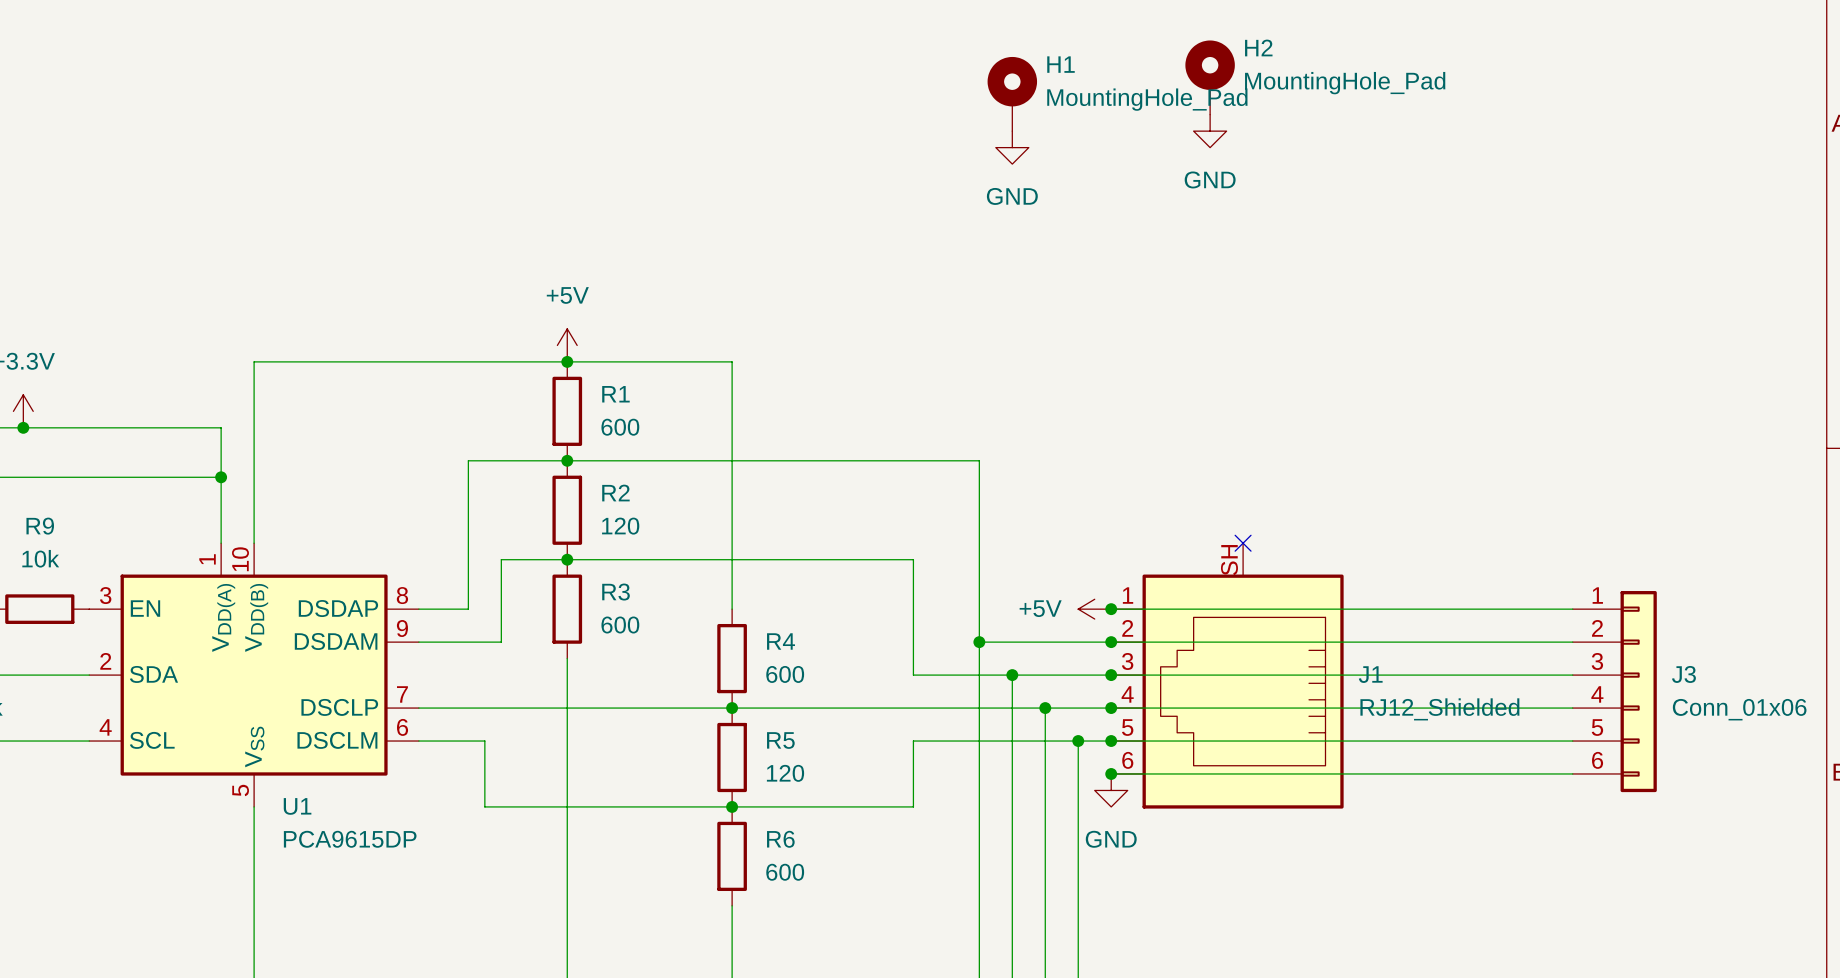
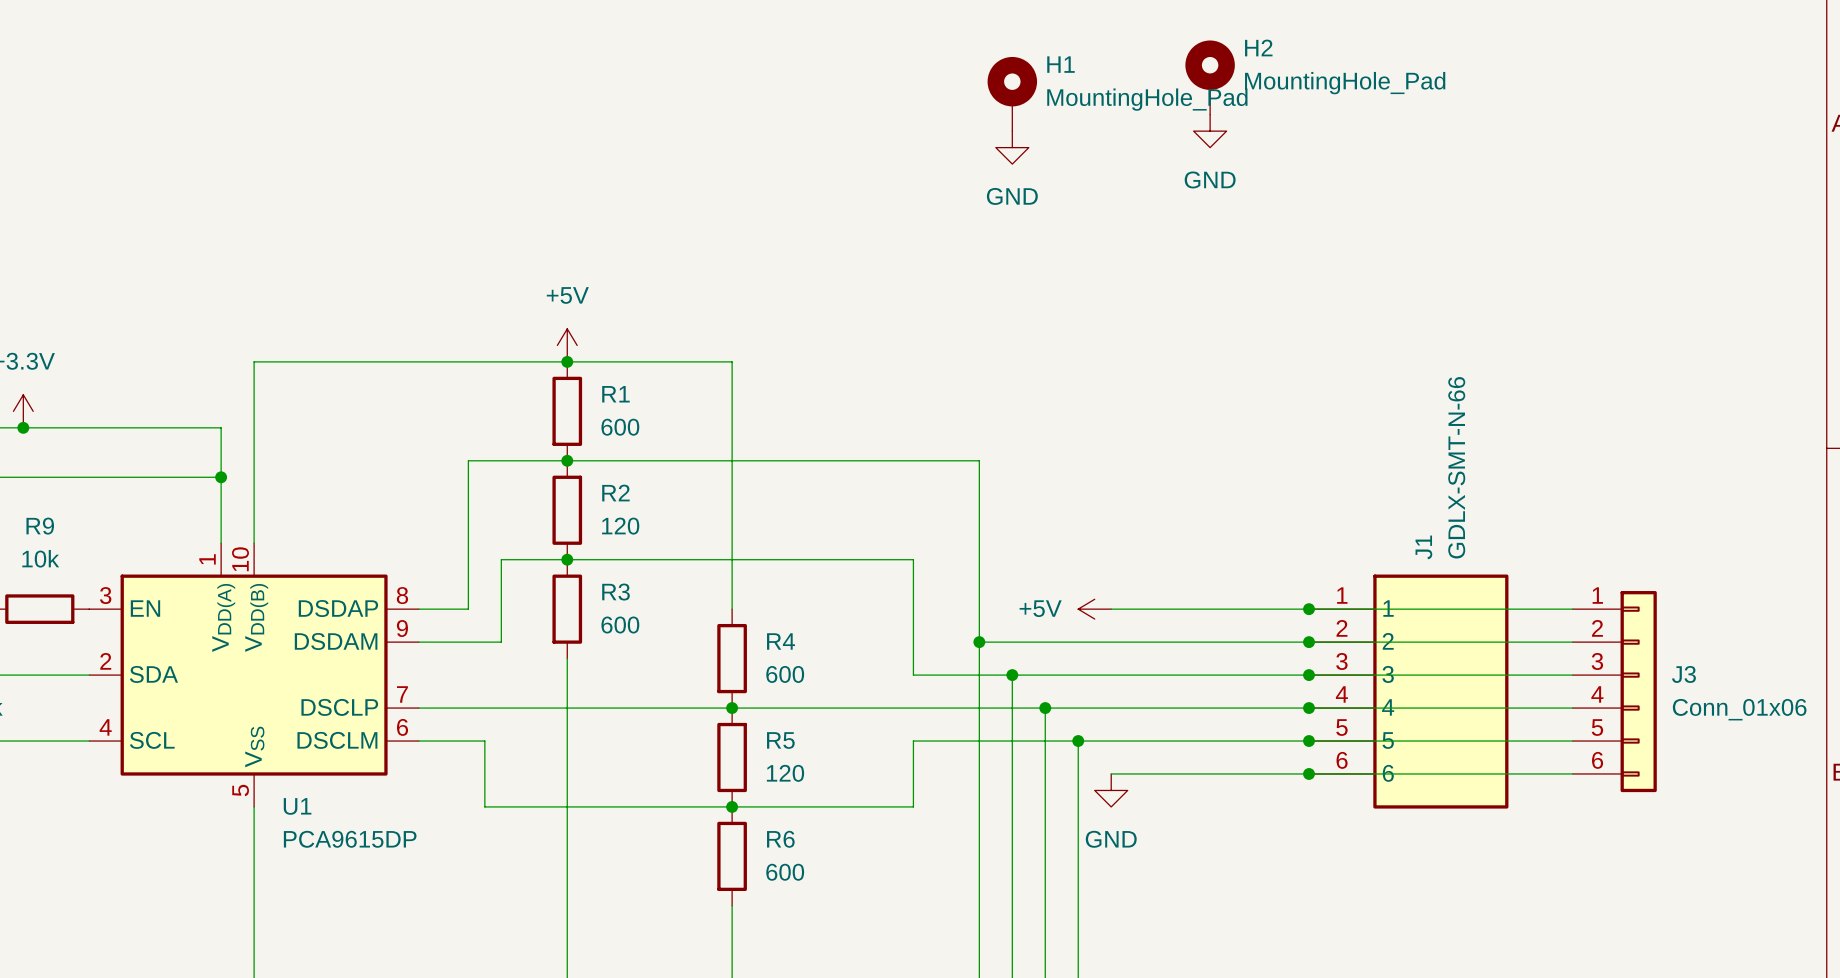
J1 symbol: [1111, 543, 1344, 809] -> [1309, 574, 1509, 809]
no-connect mark: (1243, 543) -> none
junction: (1111, 609) -> none
junction: none -> (1309, 609)
junction: (1111, 642) -> none
junction: none -> (1309, 642)
J1 name position: J1 (1370, 674) -> J1 (1423, 547)
junction: (1111, 675) -> none
junction: none -> (1309, 675)
junction: (1111, 708) -> none
junction: none -> (1309, 708)
J1 value: RJ12_Shielded (1439, 709) -> GDLX-SMT-N-66 (1456, 467)
junction: (1111, 741) -> none
junction: none -> (1309, 741)
junction: (1111, 773) -> none
junction: none -> (1309, 773)

